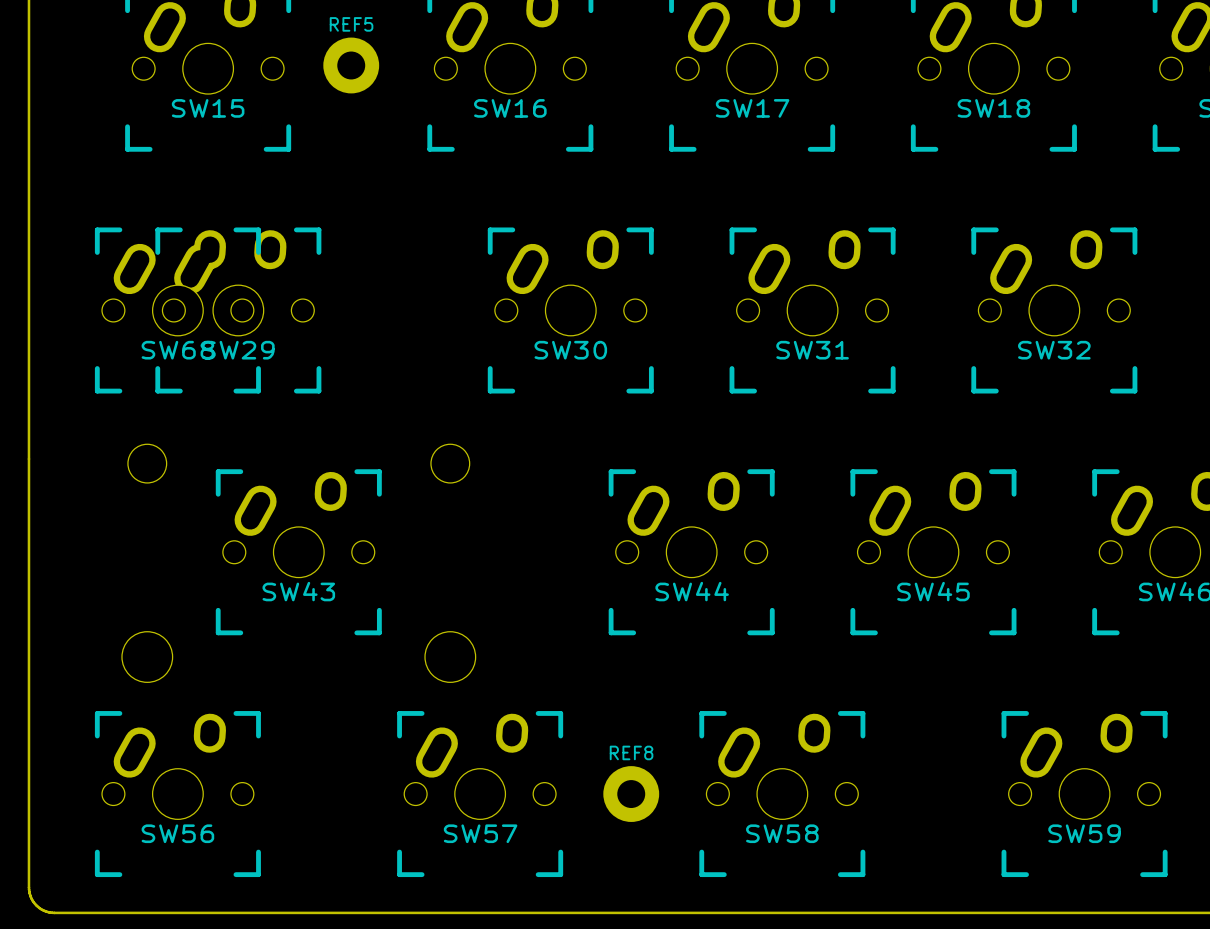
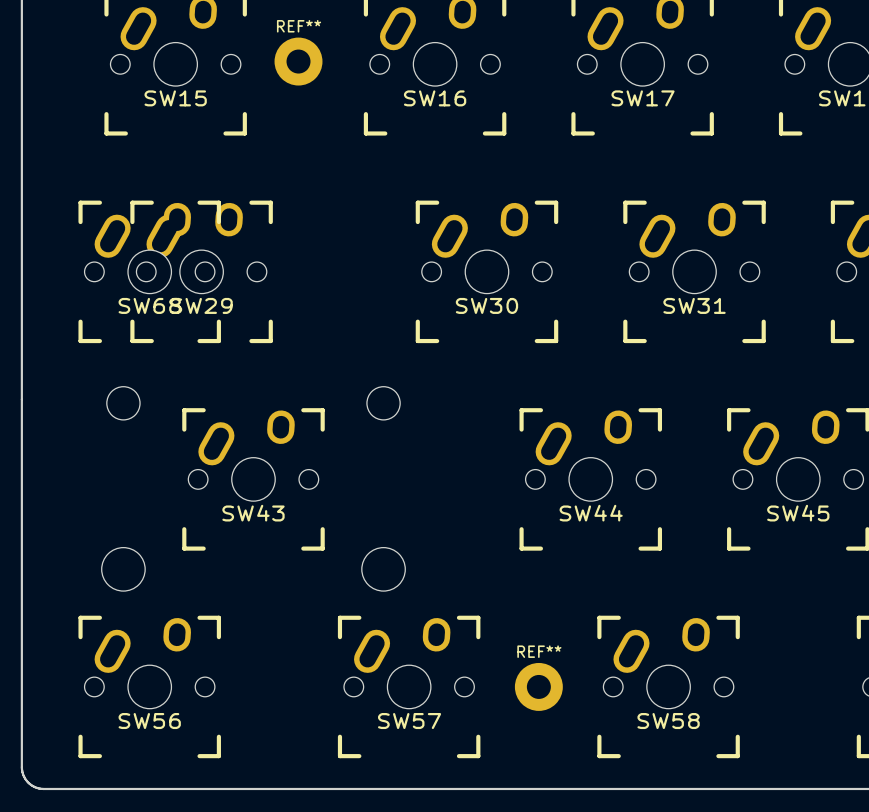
REF5 name: REF5 (351, 24) -> REF** (299, 26)
REF8 name: REF8 (631, 752) -> REF** (539, 651)

